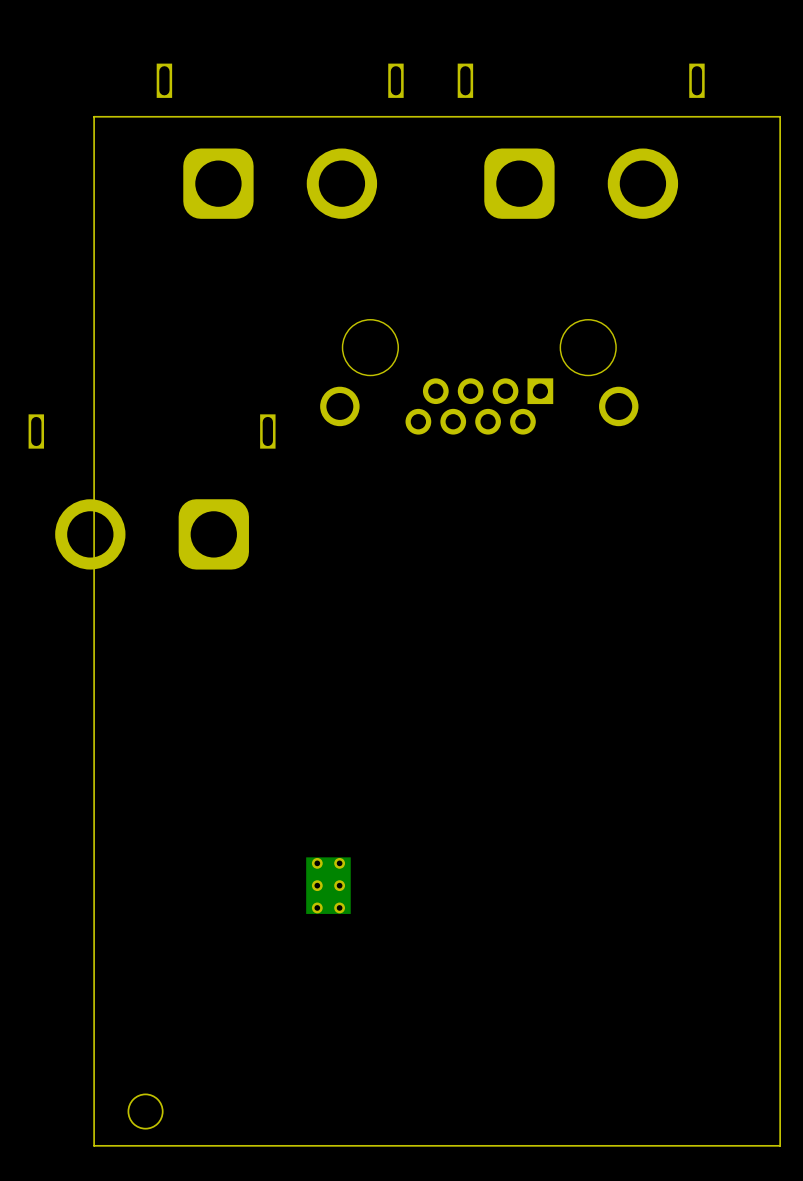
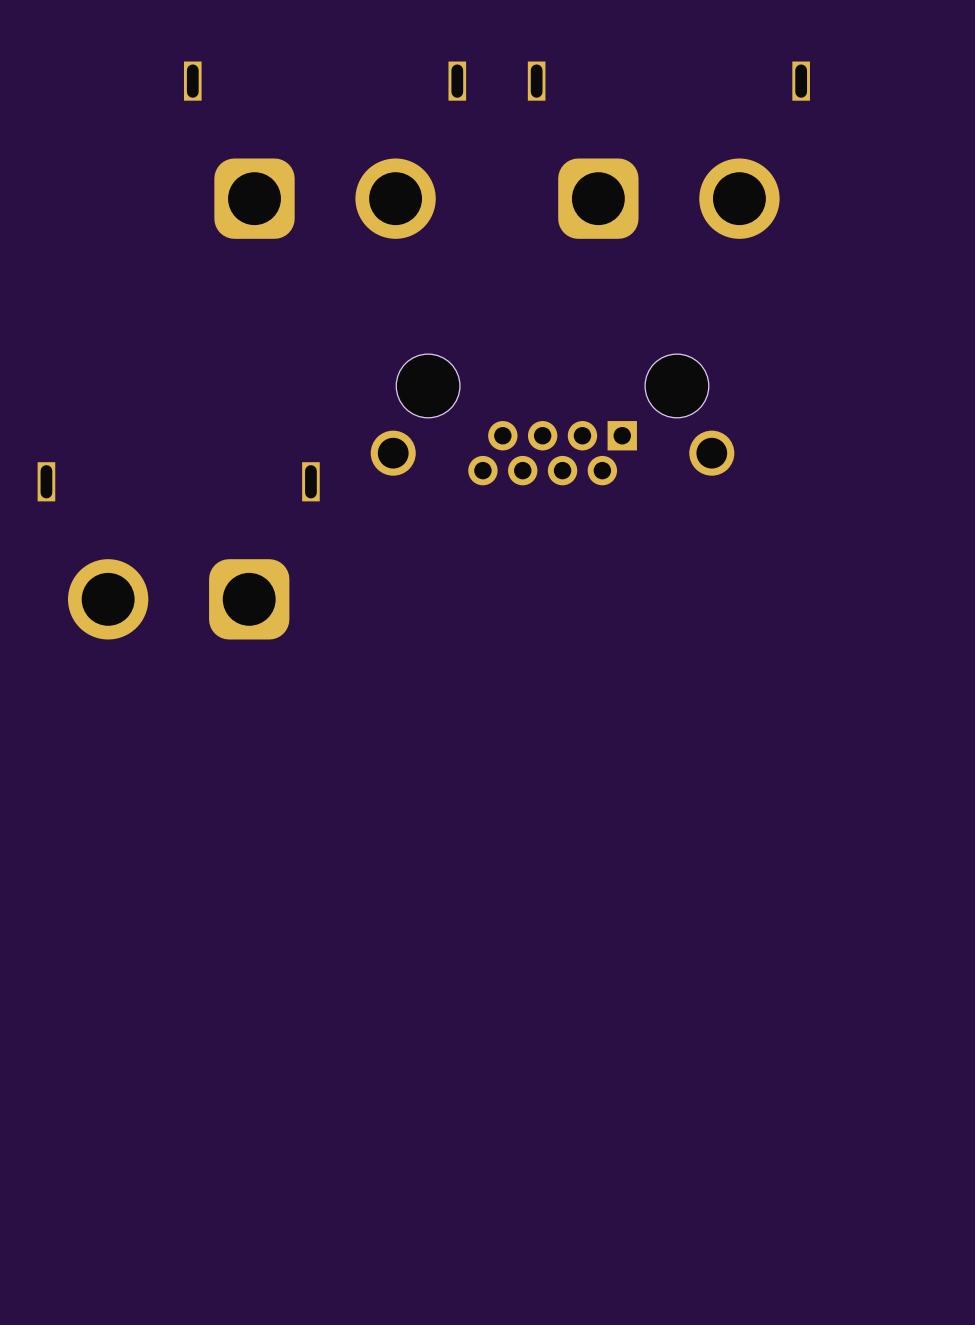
board edge: (780, 116) (94, 116) (94, 1145) (780, 1145) (780, 116) -> none
part: (328, 885) -> none
round board edge: [127, 1093, 164, 1130] -> none

